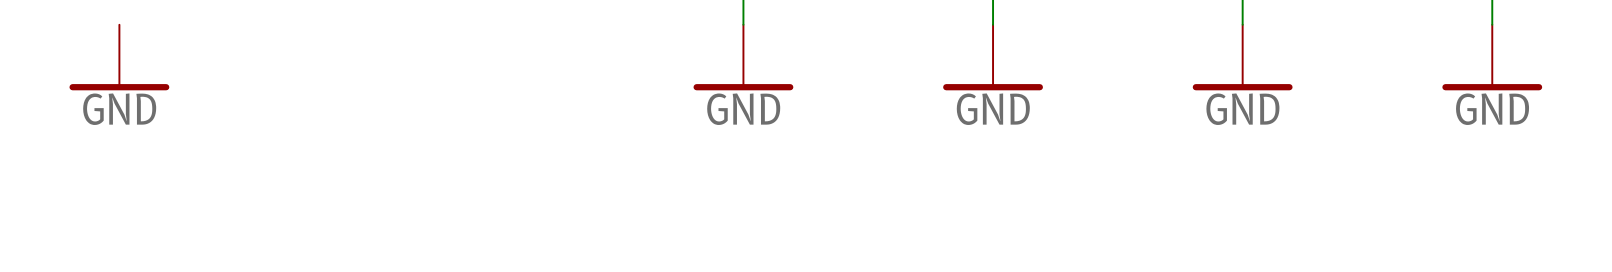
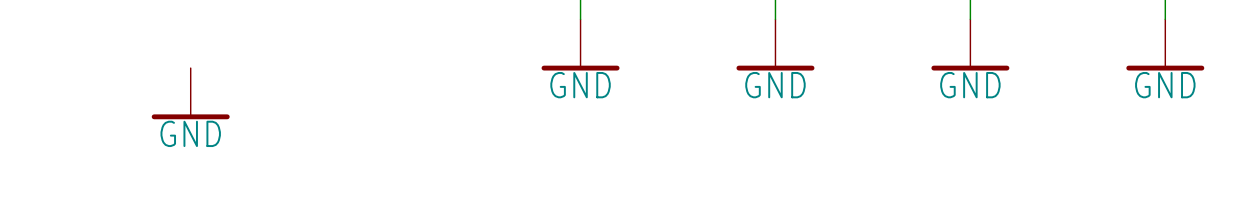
power symbol position: GND (119, 57) -> GND (190, 93)

